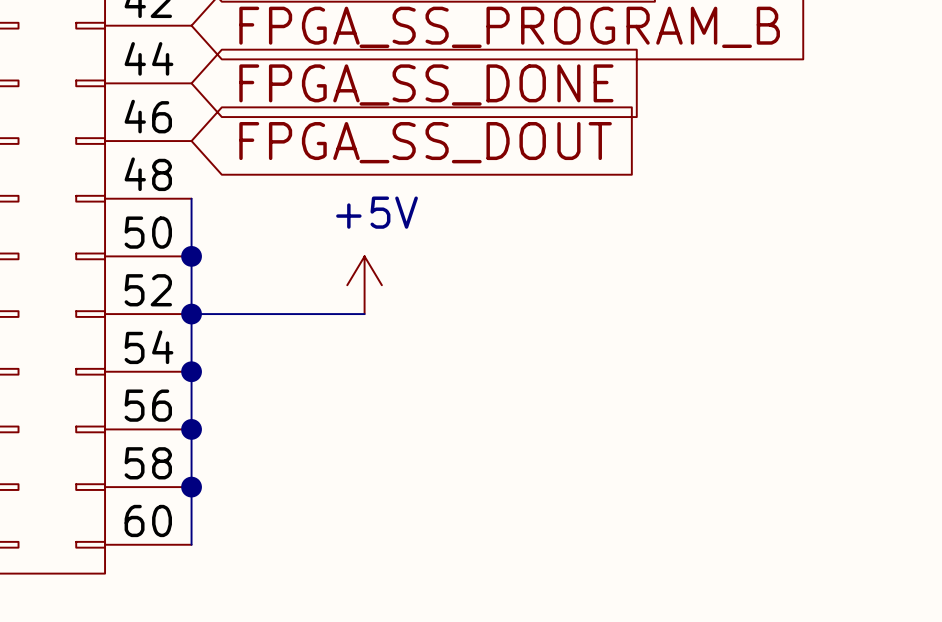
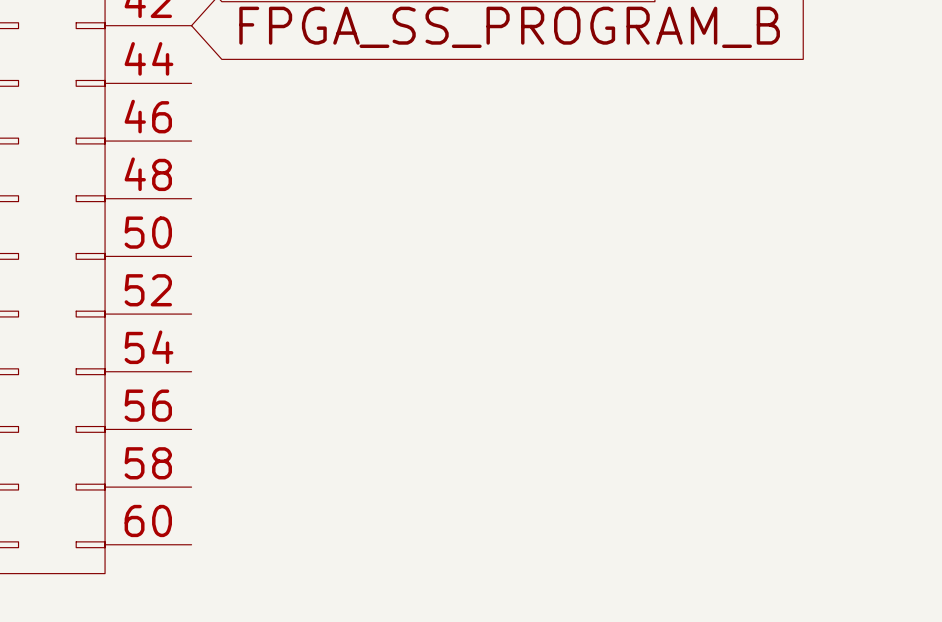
global label: FPGA_SS_DONE (426, 85) -> none
global label: FPGA_SS_DOUT (425, 142) -> none
wire: (191, 198) (191, 544) -> none
junction: (191, 256) -> none
power symbol: +5V (364, 285) -> none
wire: (191, 314) (364, 314) -> none
junction: (191, 314) -> none
junction: (191, 371) -> none
junction: (191, 429) -> none
junction: (191, 487) -> none

